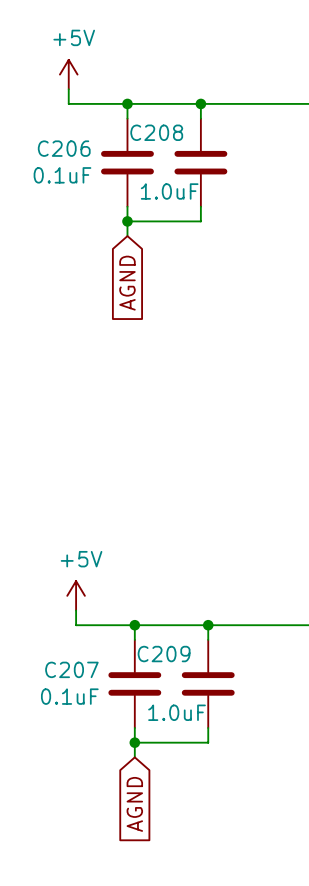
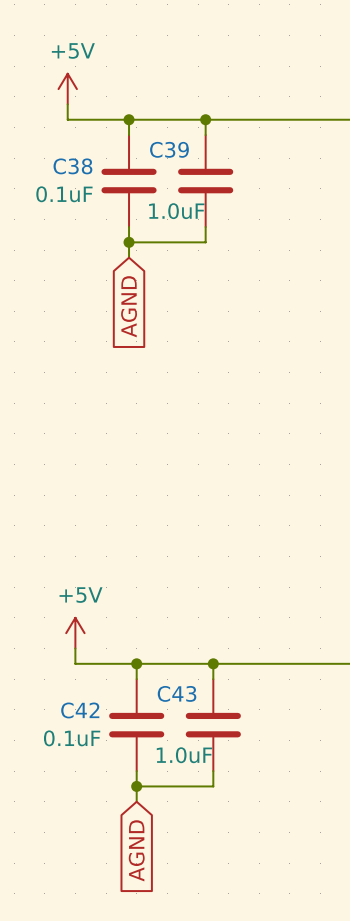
C208 name: C208 (156, 132) -> C39 (169, 149)
C206 name: C206 (64, 148) -> C38 (72, 166)
C209 name: C209 (164, 654) -> C43 (177, 693)
C207 name: C207 (71, 669) -> C42 (80, 710)

